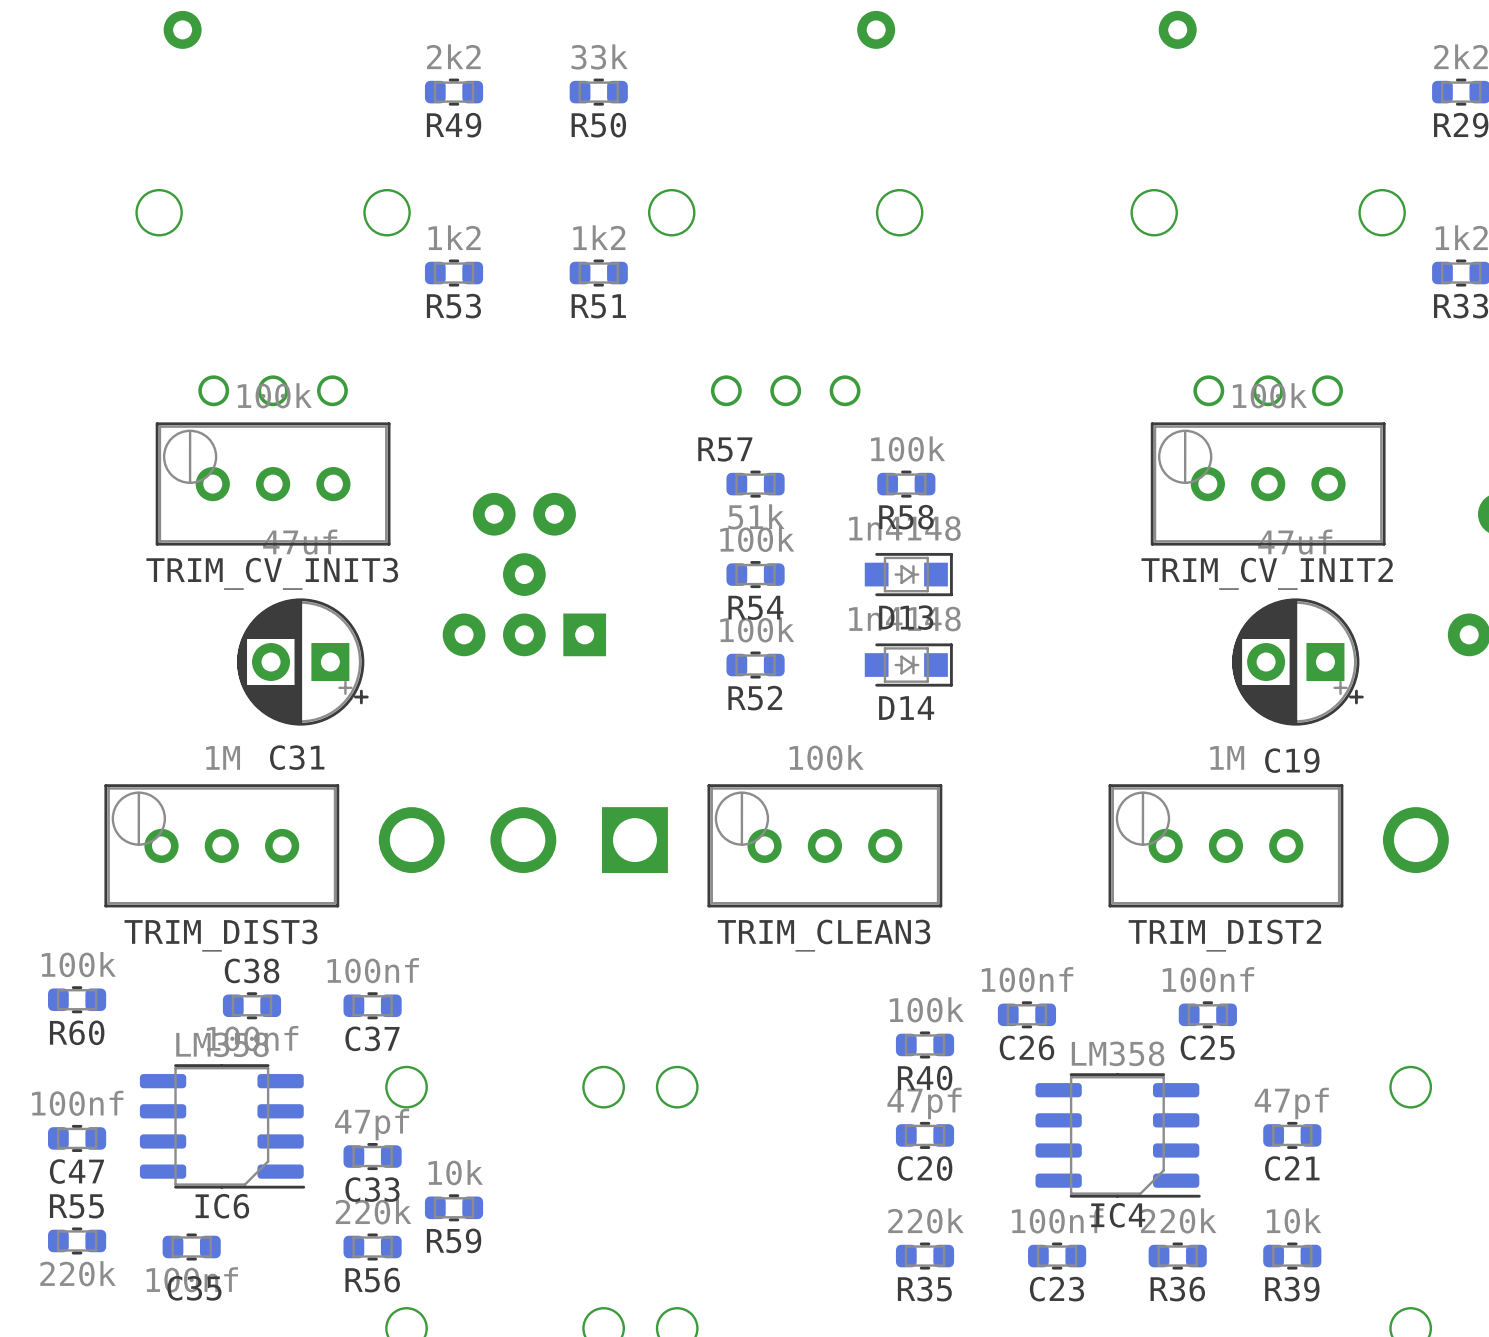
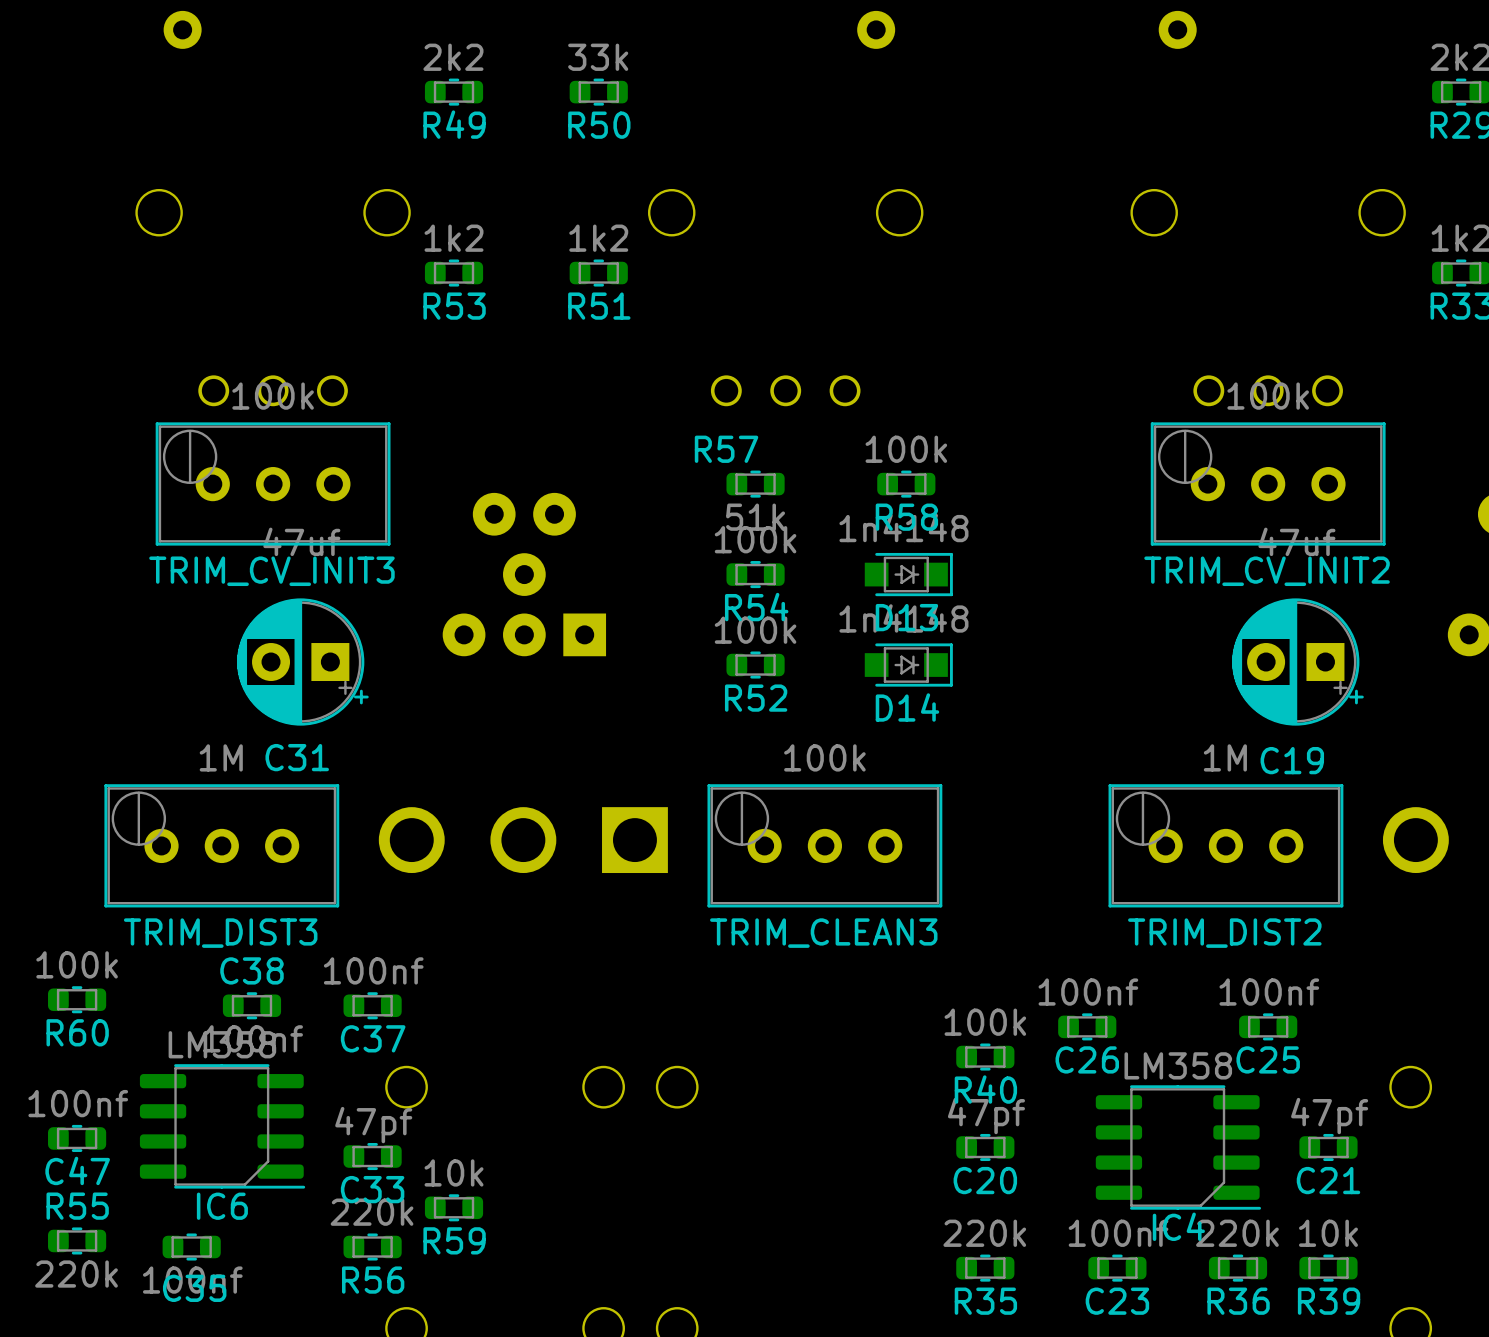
C26 position: (1026, 1014) -> (1087, 1026)
C25 position: (1207, 1014) -> (1268, 1026)
R40 position: (925, 1044) -> (985, 1057)
C20 position: (925, 1135) -> (985, 1147)
IC4 position: (1118, 1135) -> (1178, 1147)
C21 position: (1292, 1135) -> (1328, 1147)
R35 position: (925, 1256) -> (985, 1268)
C23 position: (1057, 1256) -> (1117, 1268)
R36 position: (1177, 1256) -> (1238, 1268)
R39 position: (1292, 1256) -> (1328, 1268)

